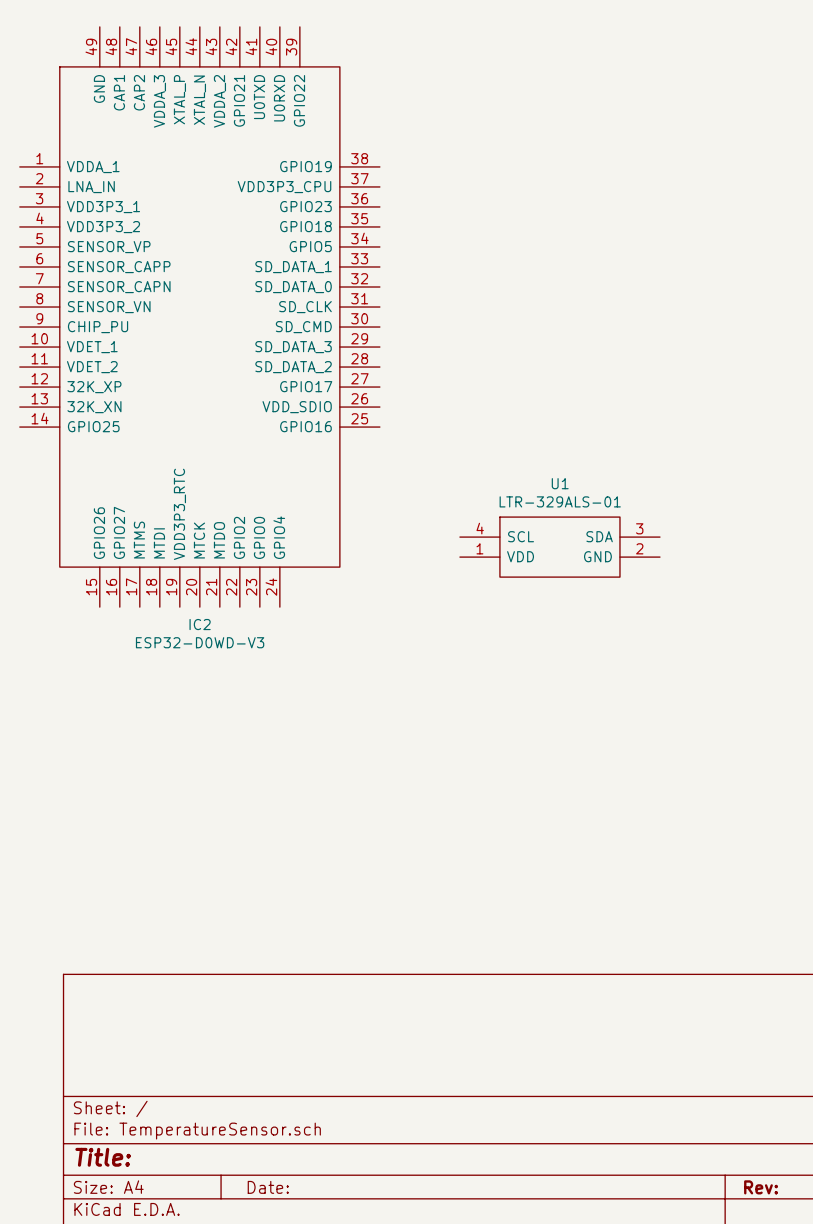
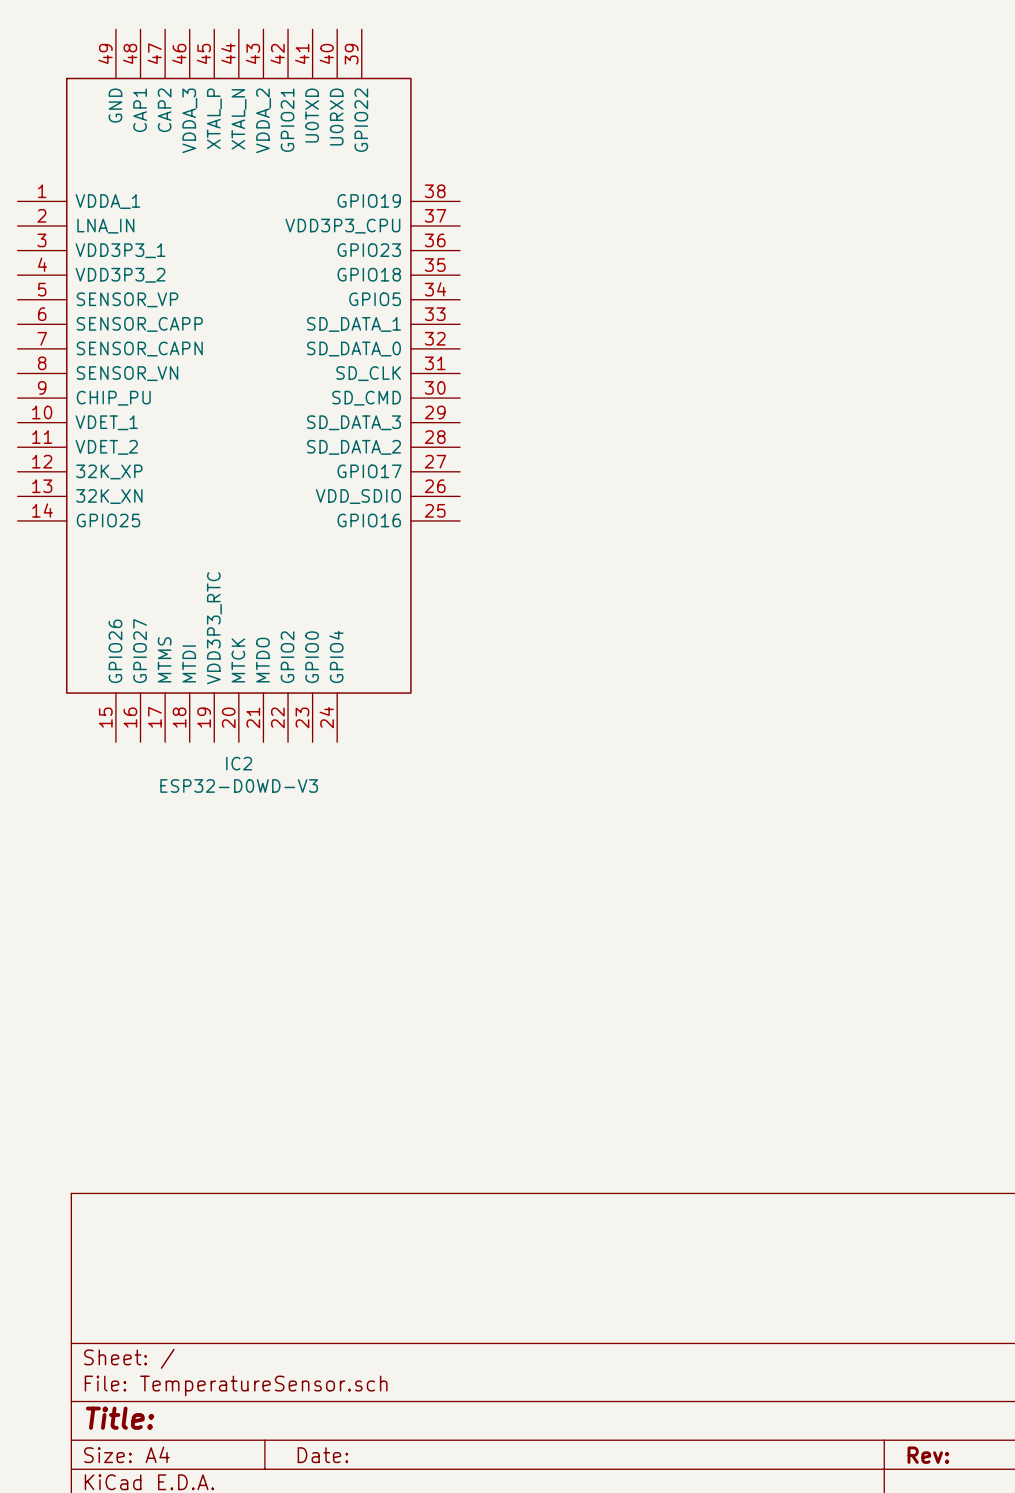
U1: LTR-329ALS-01 (559, 547) -> none

